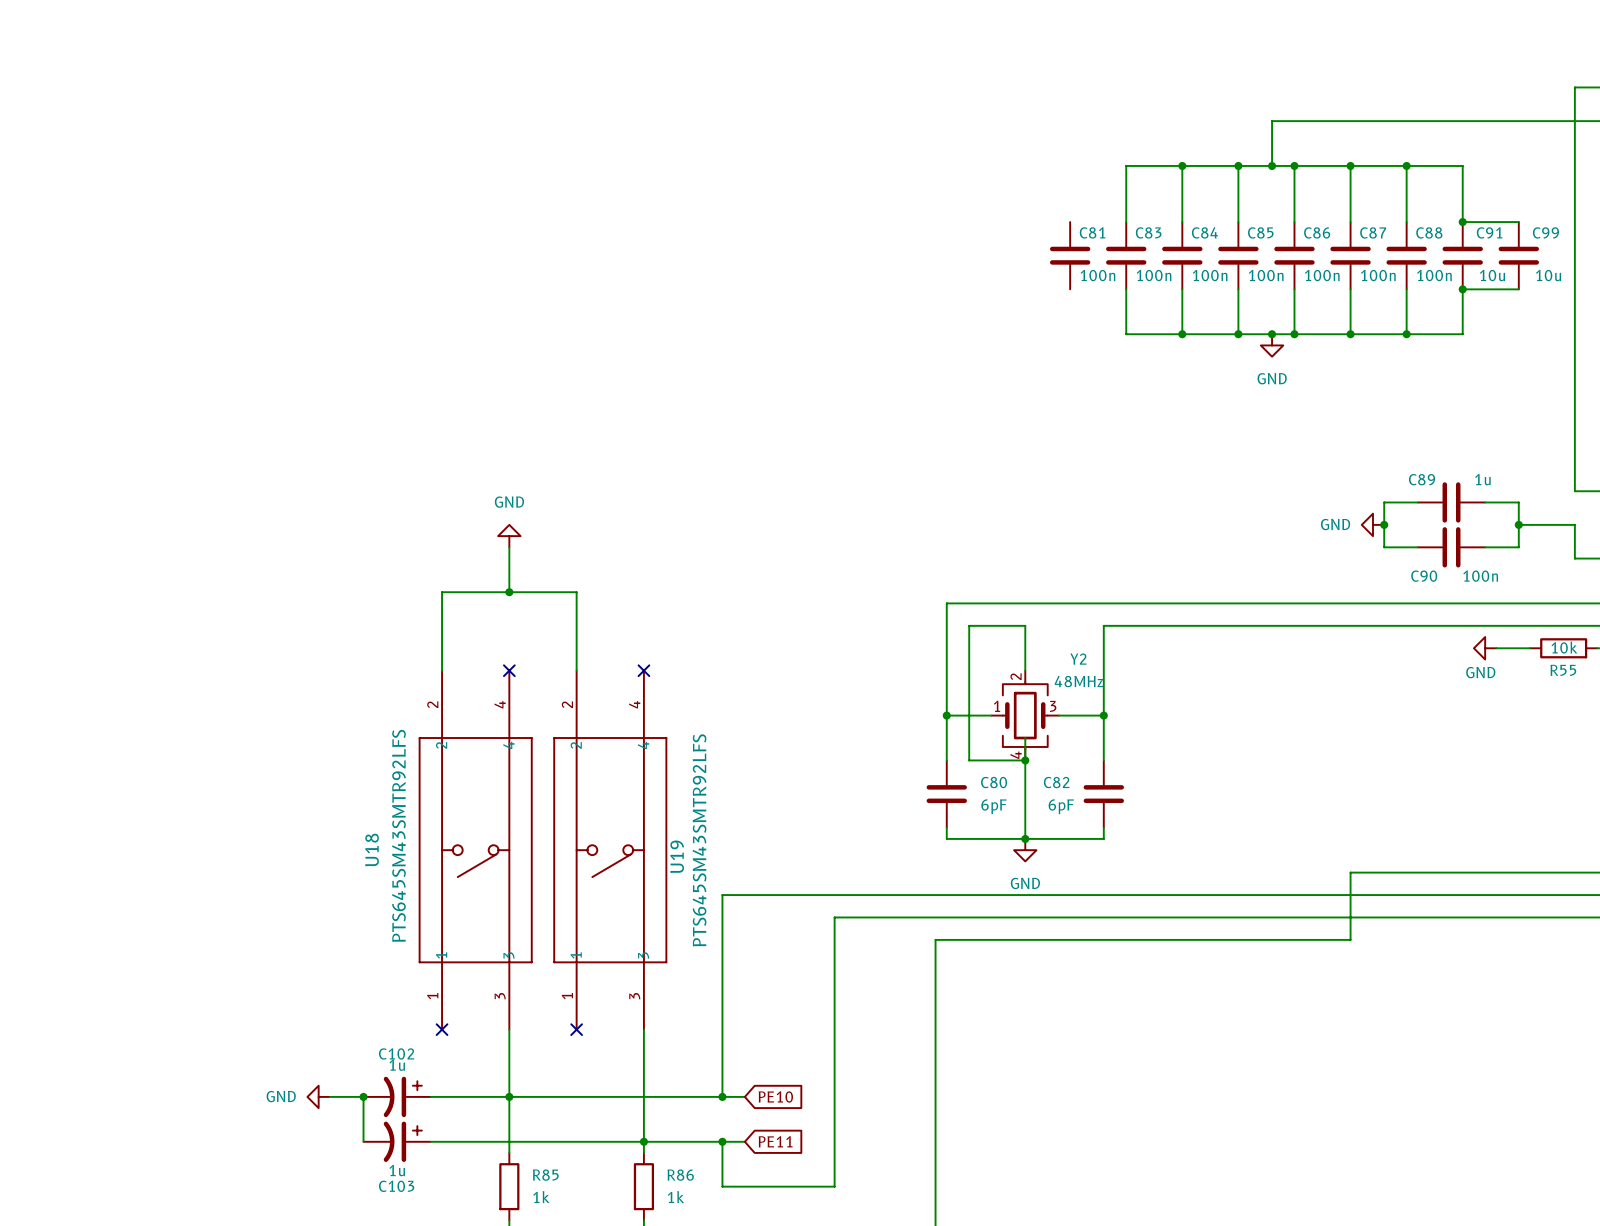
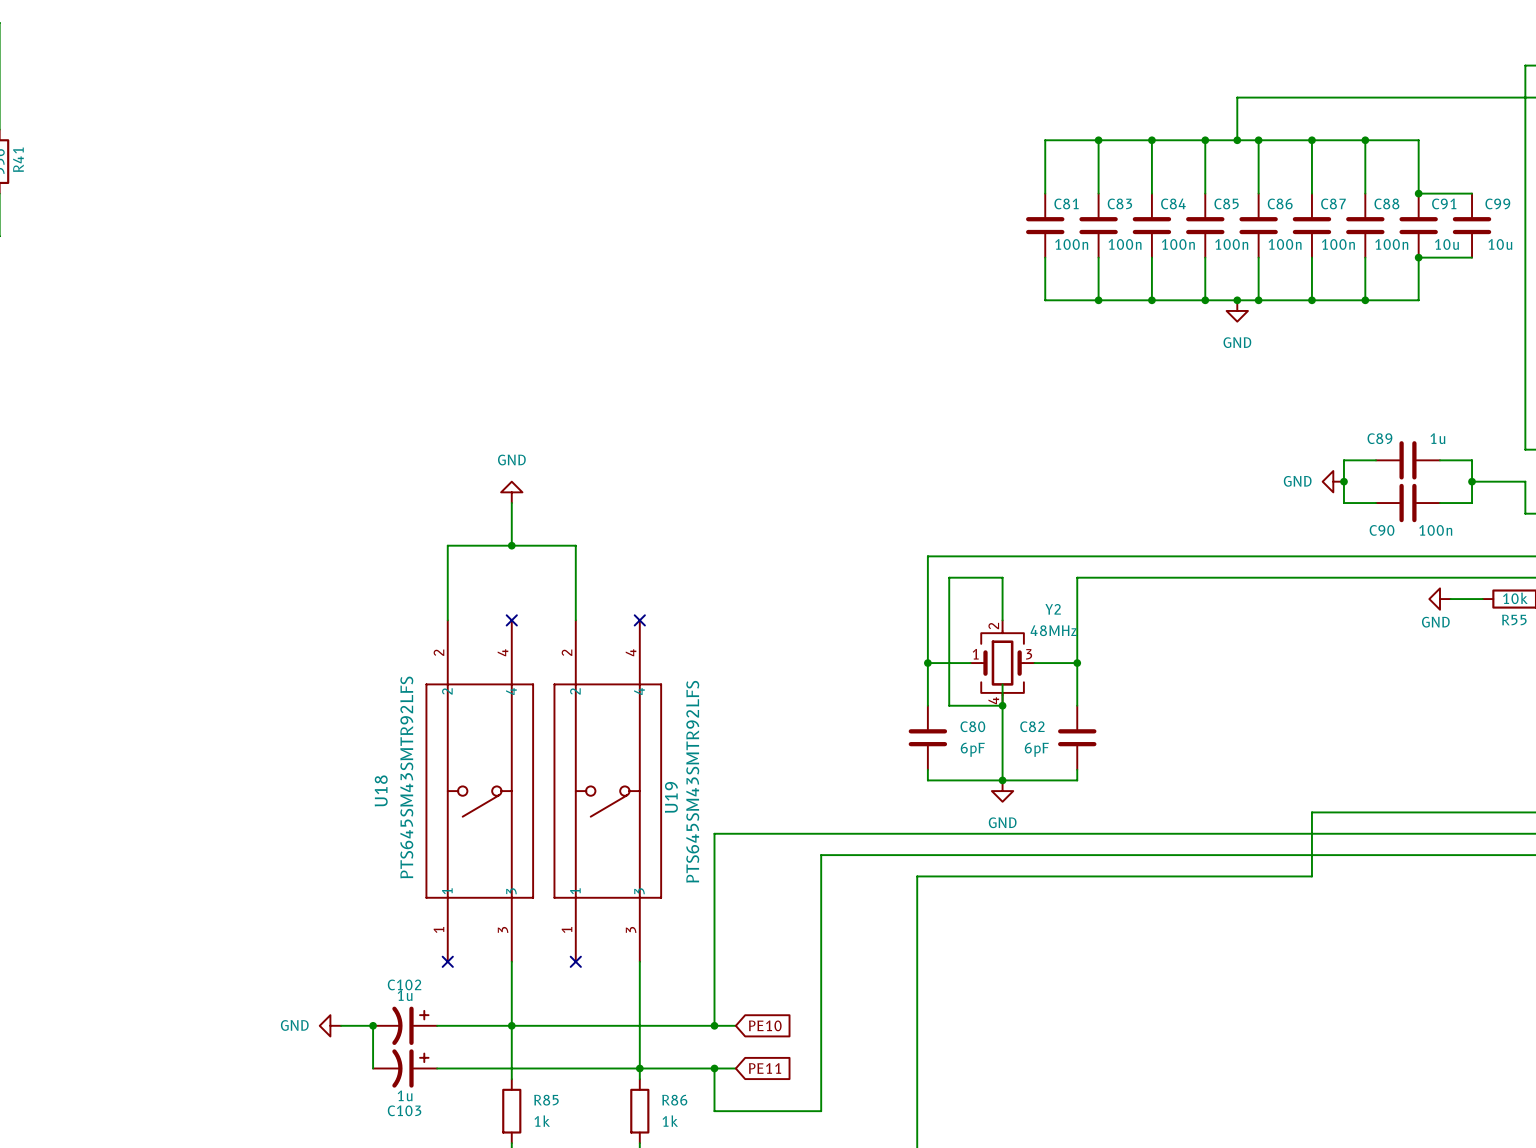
wire: none -> (1098, 140) (1045, 140) (1045, 193)
junction: none -> (1098, 140)
wire: none -> (1045, 257) (1045, 300) (1098, 300)
junction: none -> (1098, 300)

